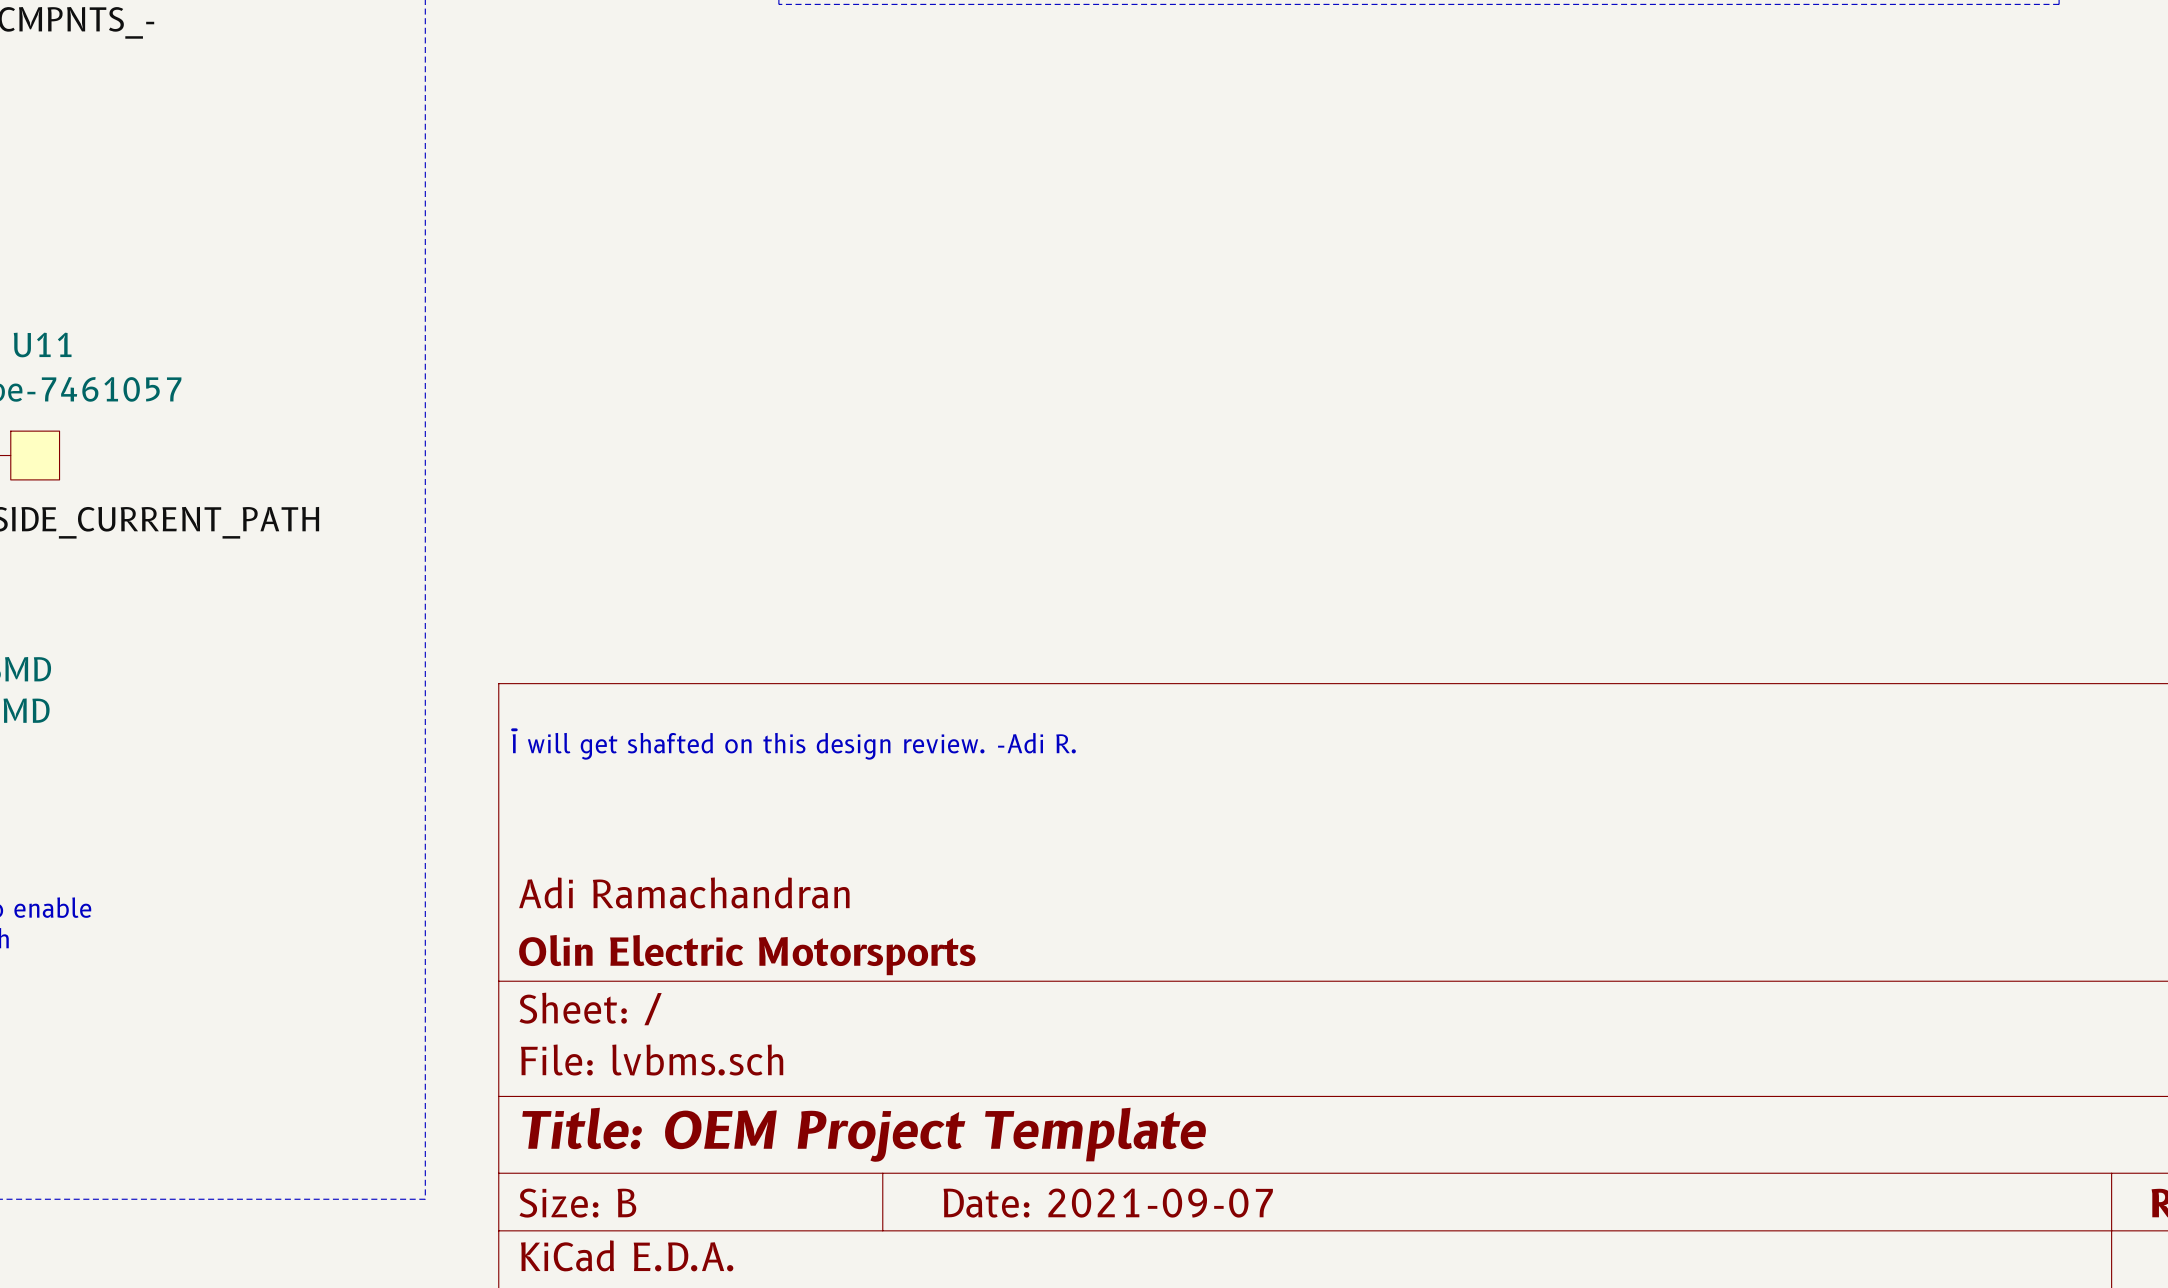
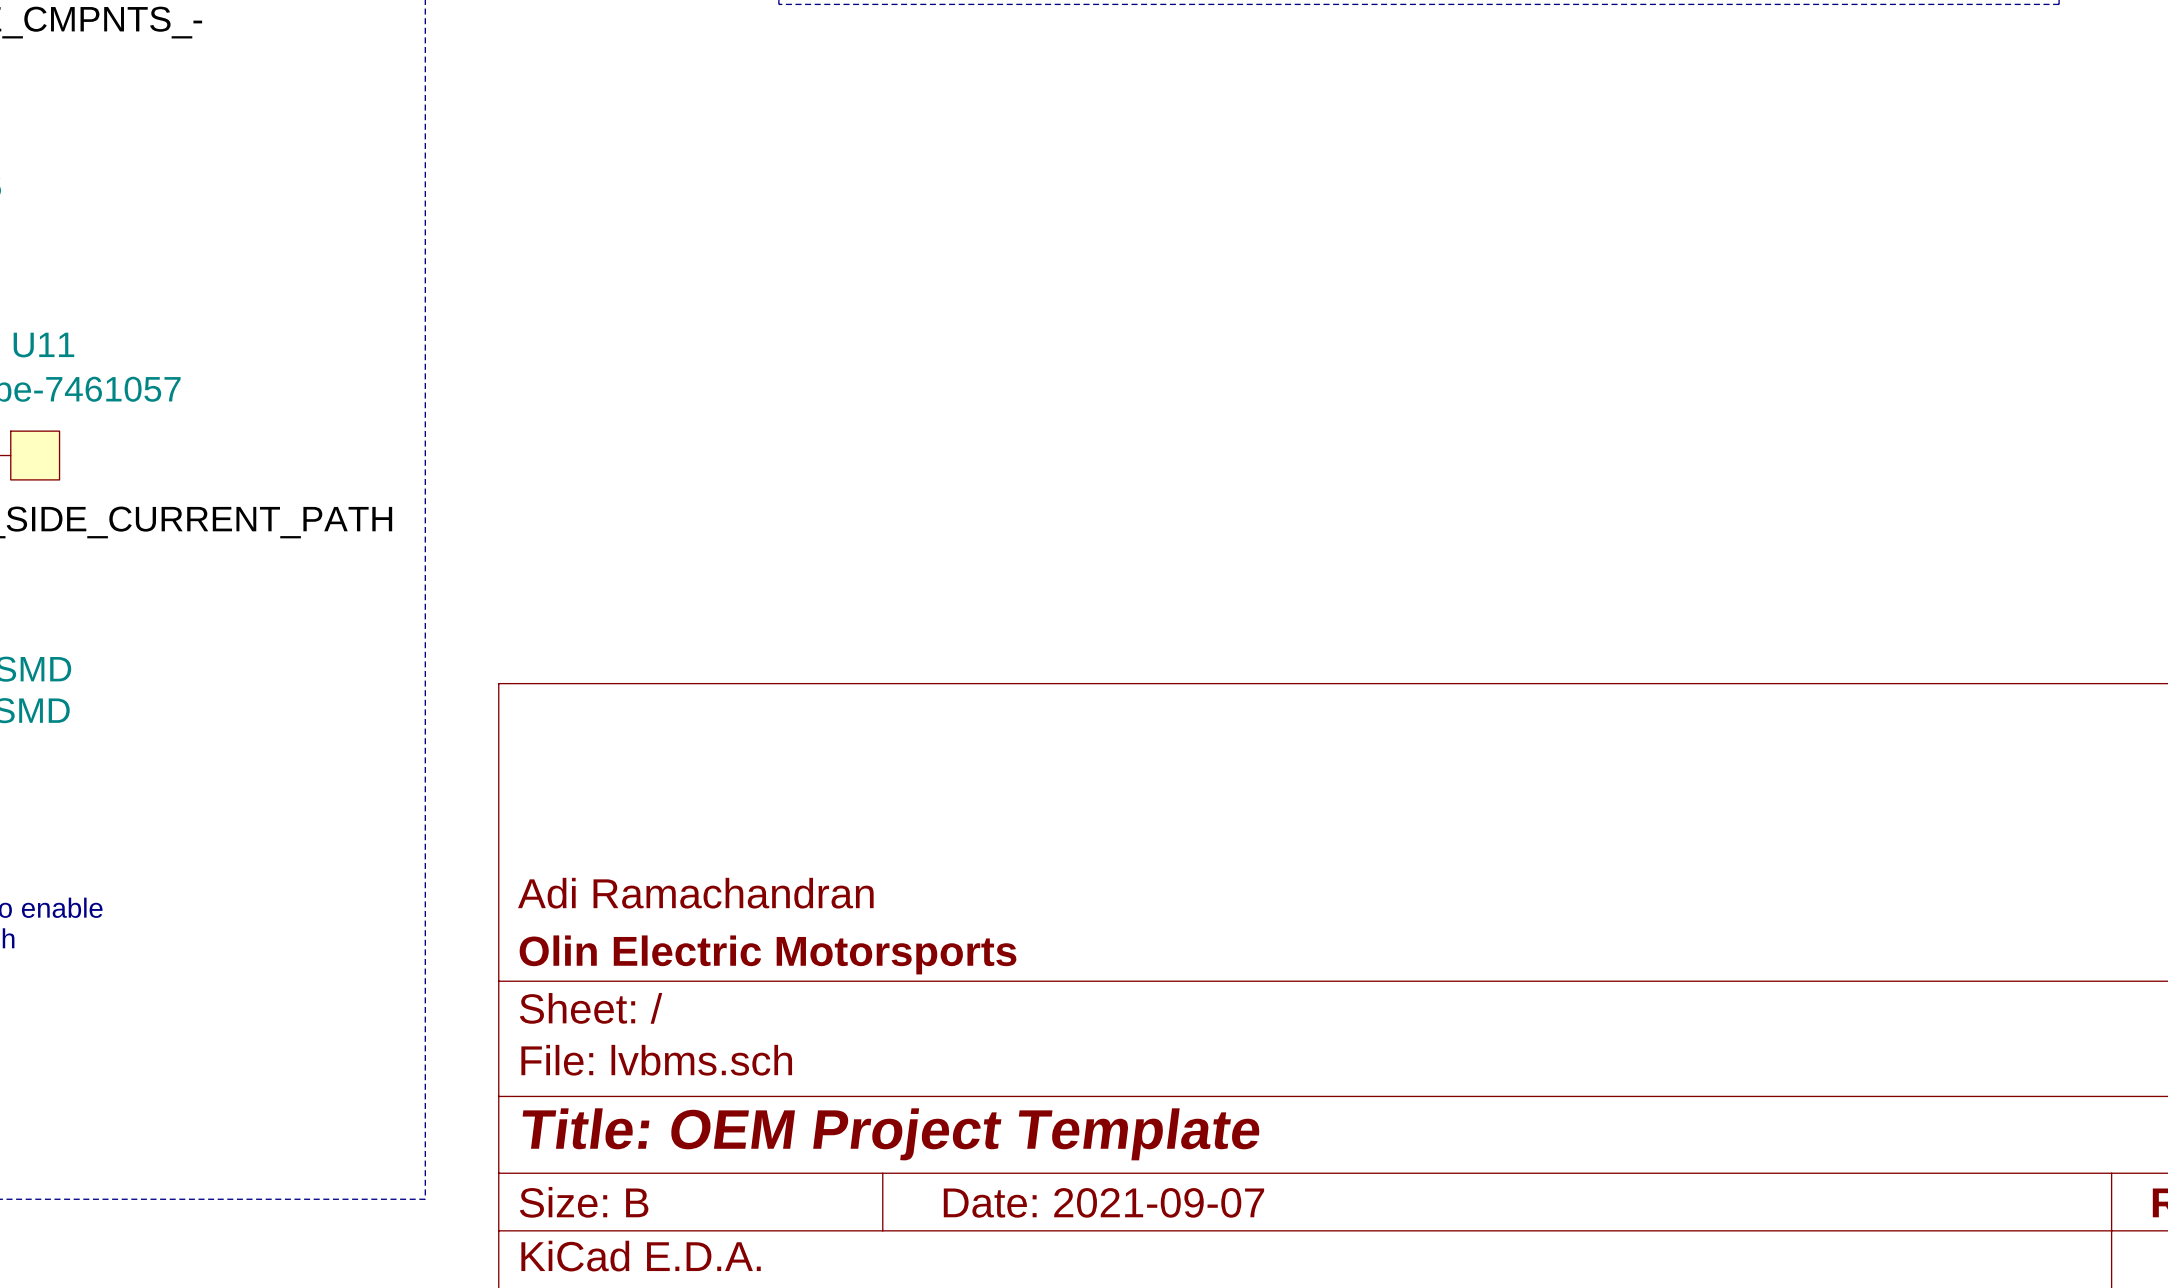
text: ~{I} will get shafted on this design review. -Adi R. (794, 744) -> none

